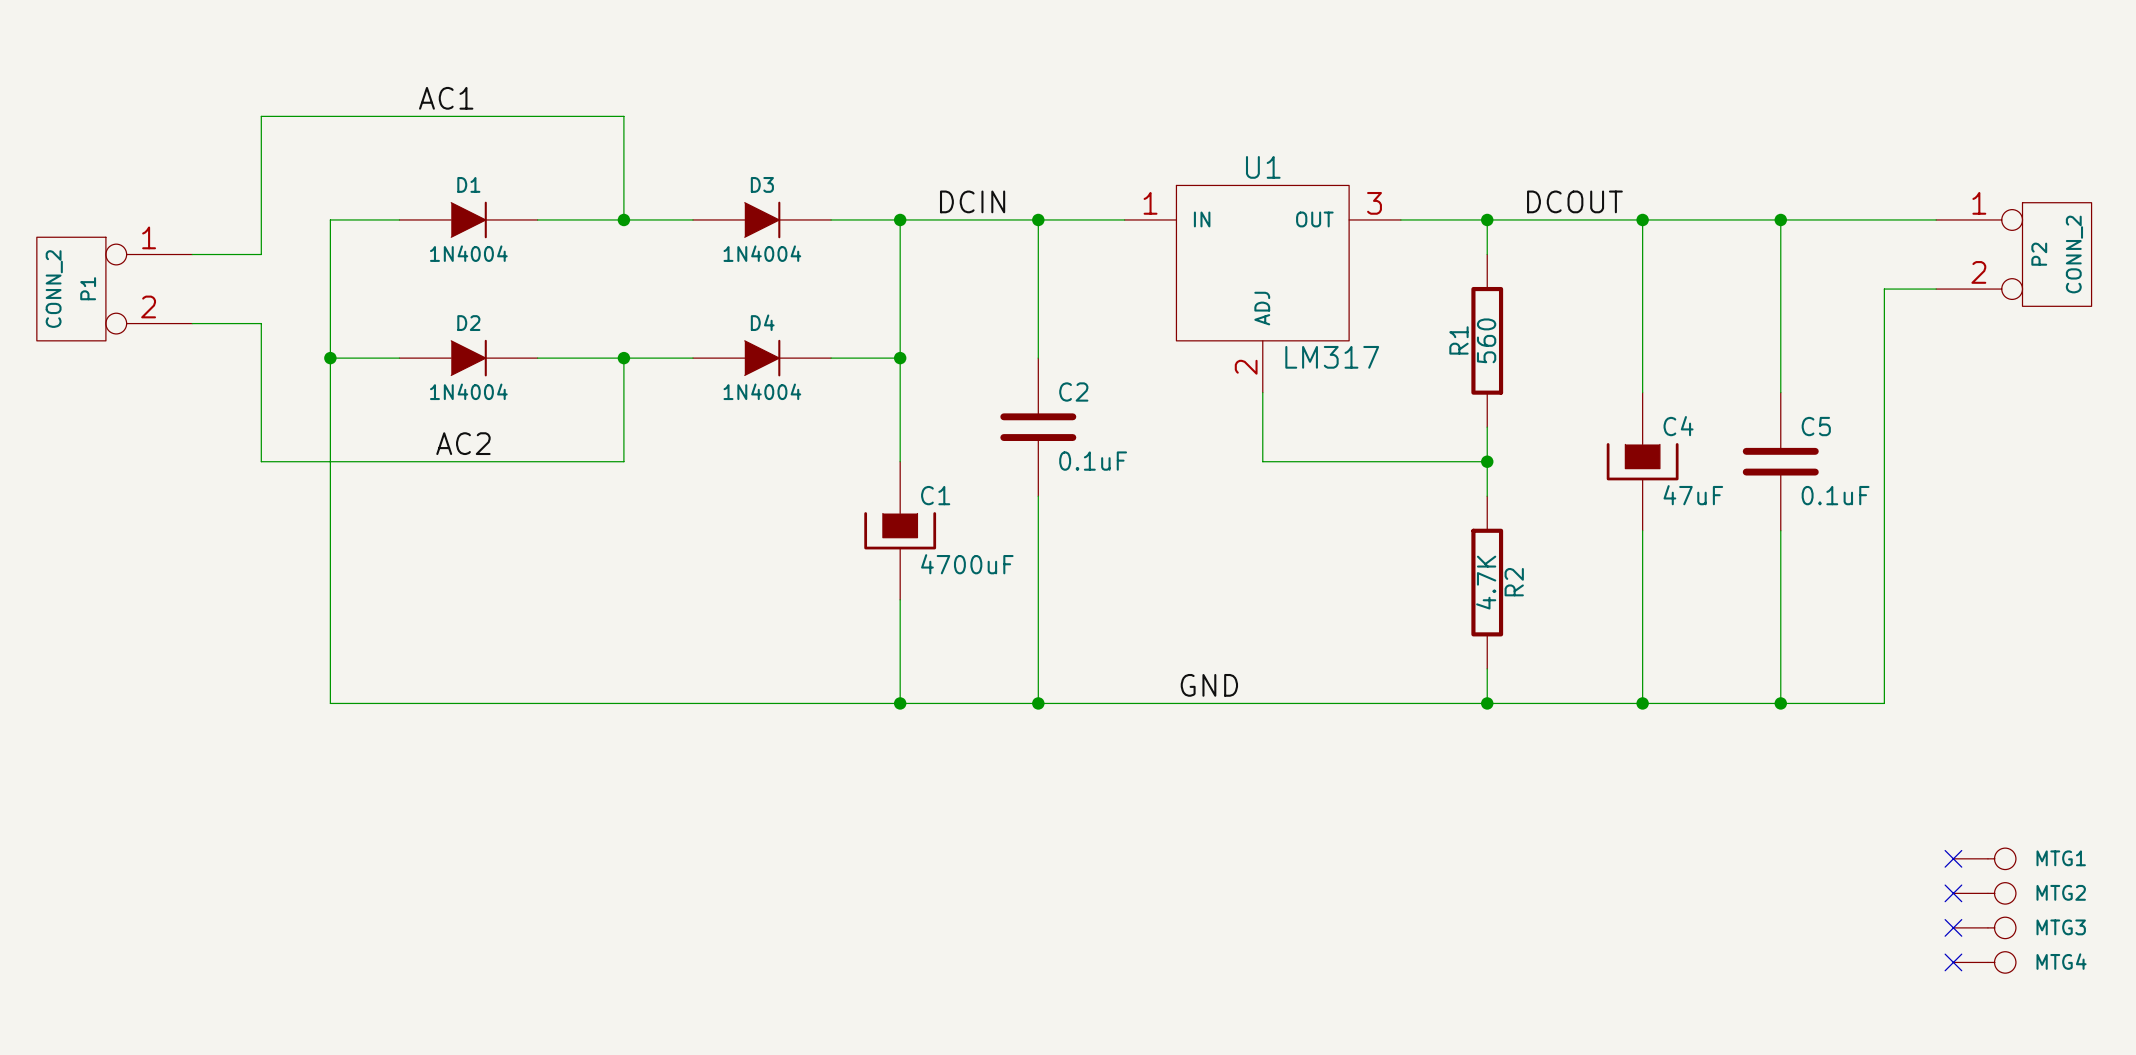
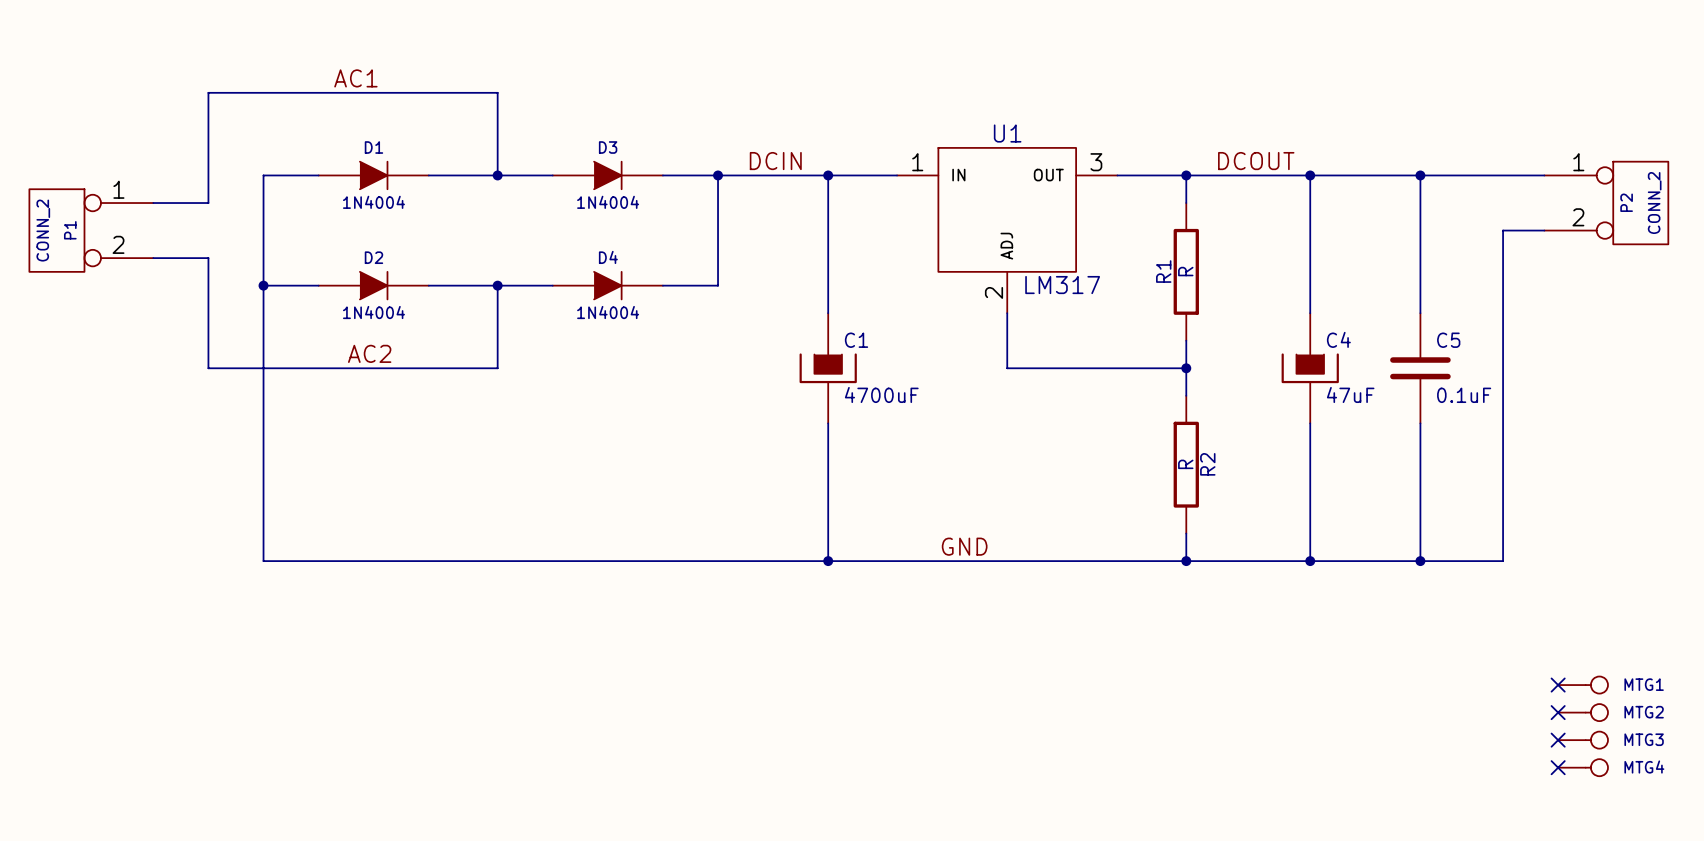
R1 value: 560 (1486, 340) -> R (1185, 271)
wire: (900, 358) (900, 461) -> none
junction: (900, 358) -> none
C2: 0.1uF (1038, 427) -> none
C1 position: (900, 530) -> (828, 368)
R2 value: 4.7K (1486, 582) -> R (1185, 464)
wire: (900, 599) (900, 703) -> none
junction: (900, 703) -> none

